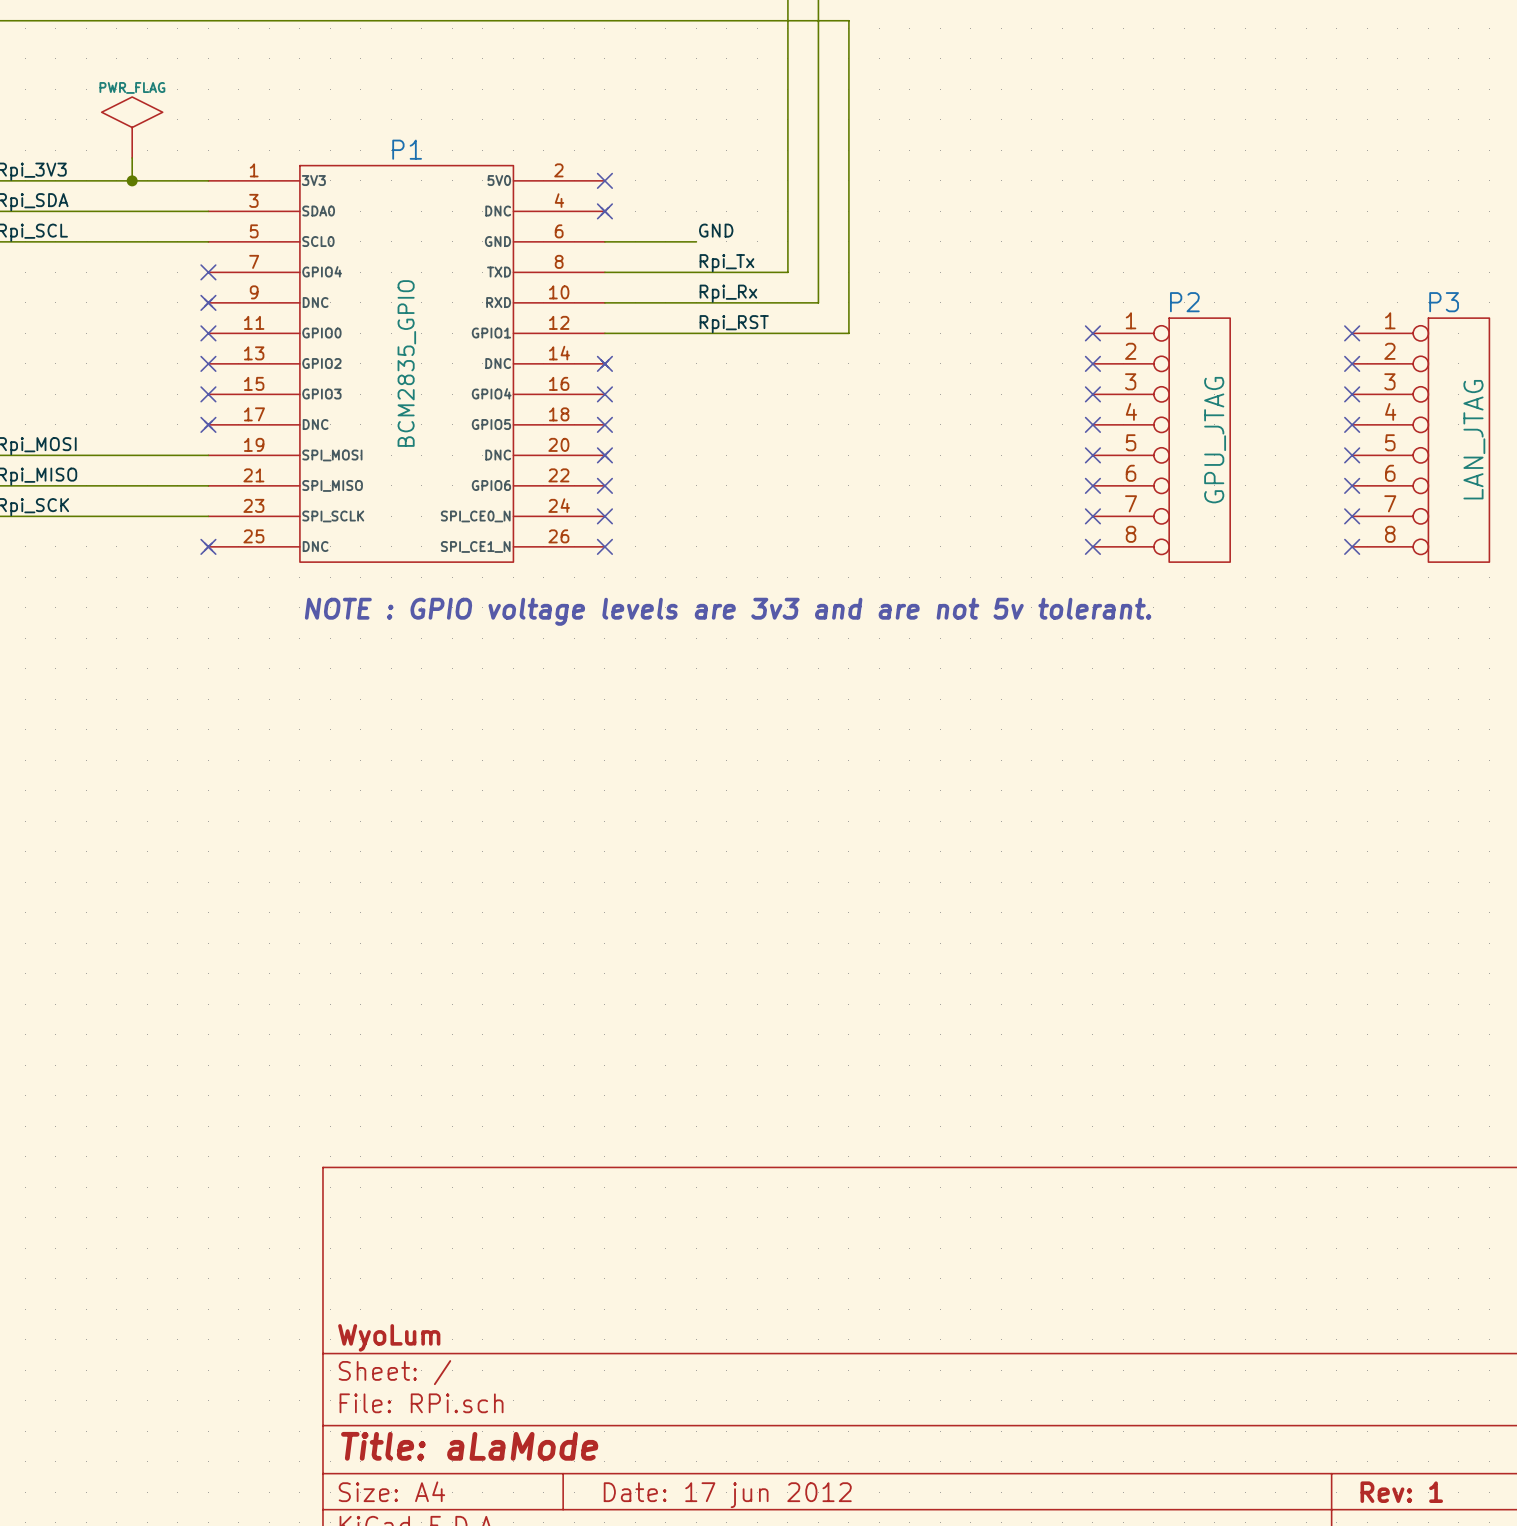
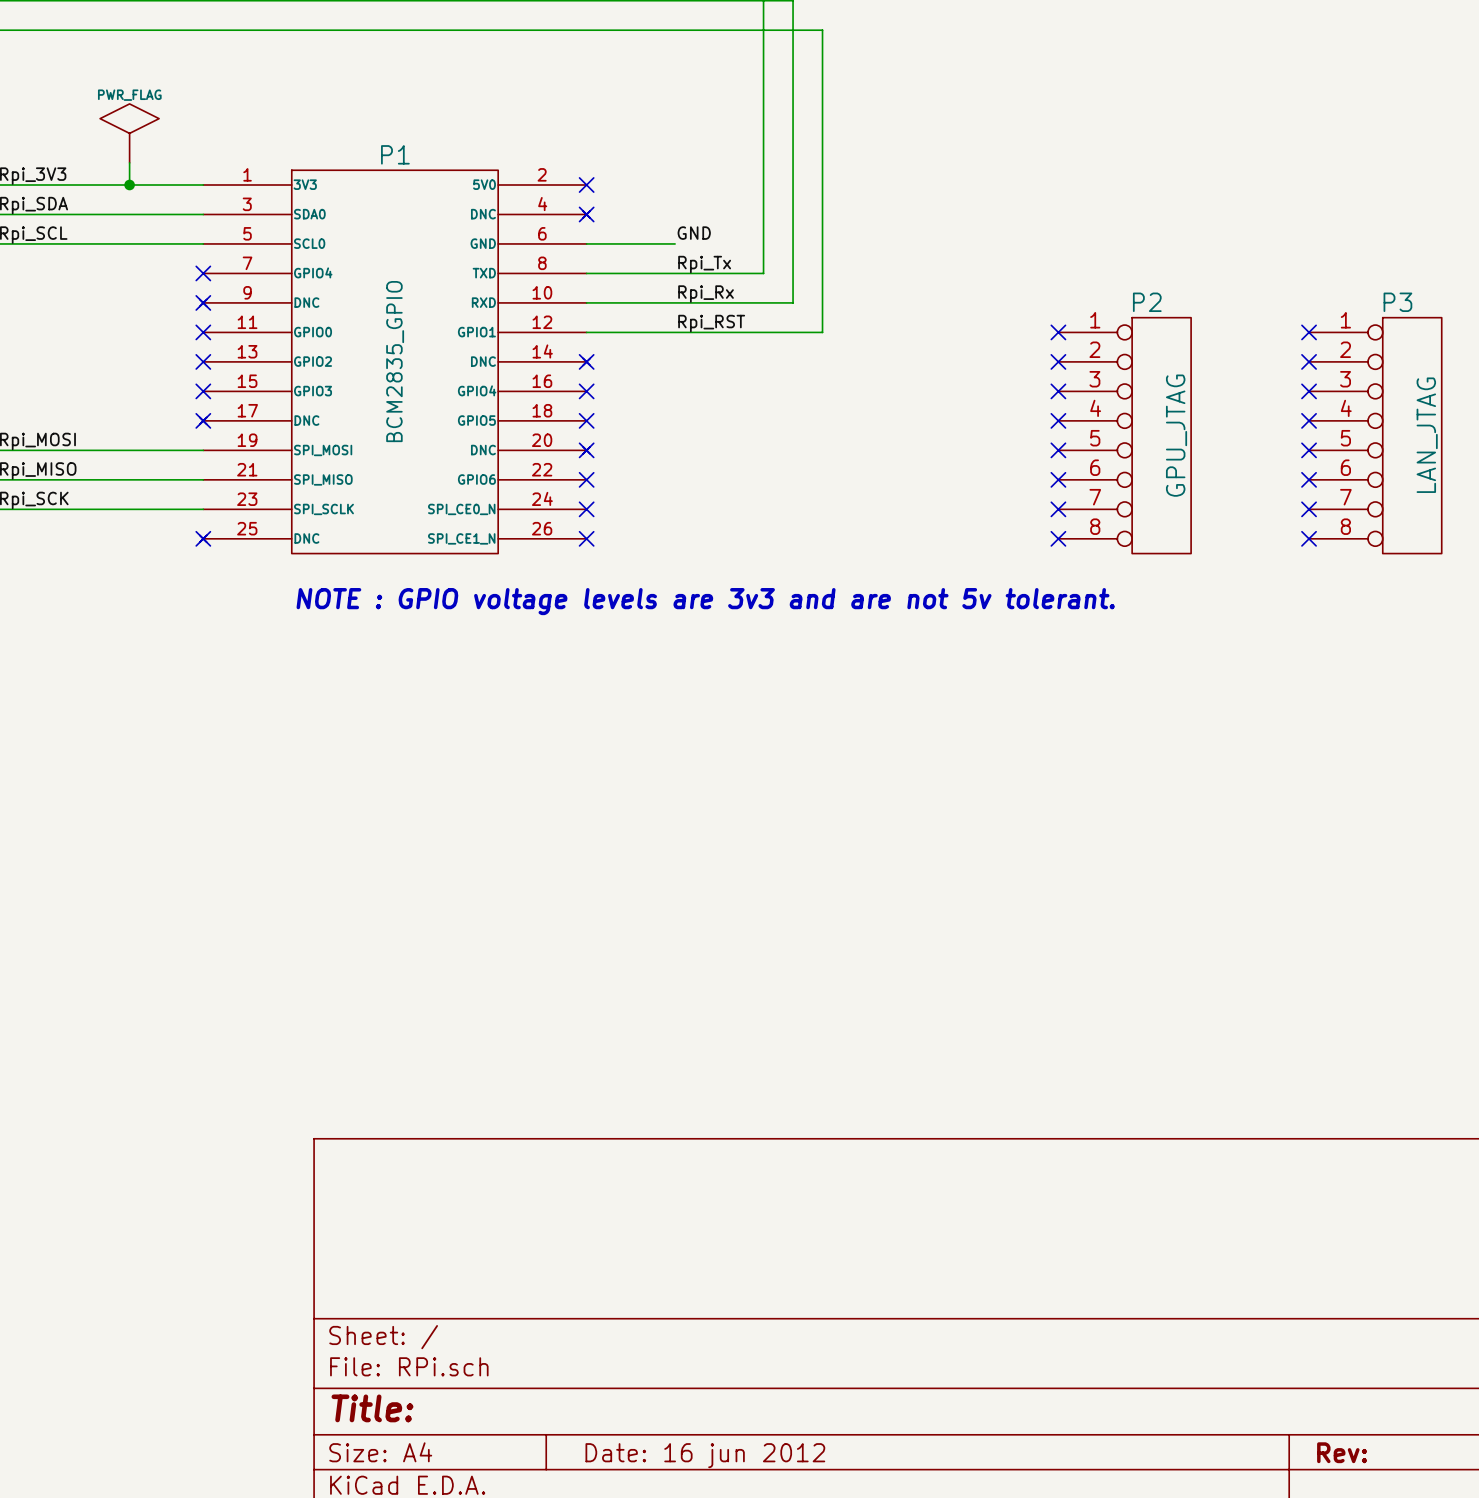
title block: WyoLum (389, 1337) -> none
title block: Title: aLaMode (469, 1446) -> Title: (372, 1408)
title block: Rev: 1 (1401, 1492) -> Rev: (1342, 1452)
title block: Date: 17 jun 2012 (727, 1495) -> Date: 16 jun 2012 (705, 1455)

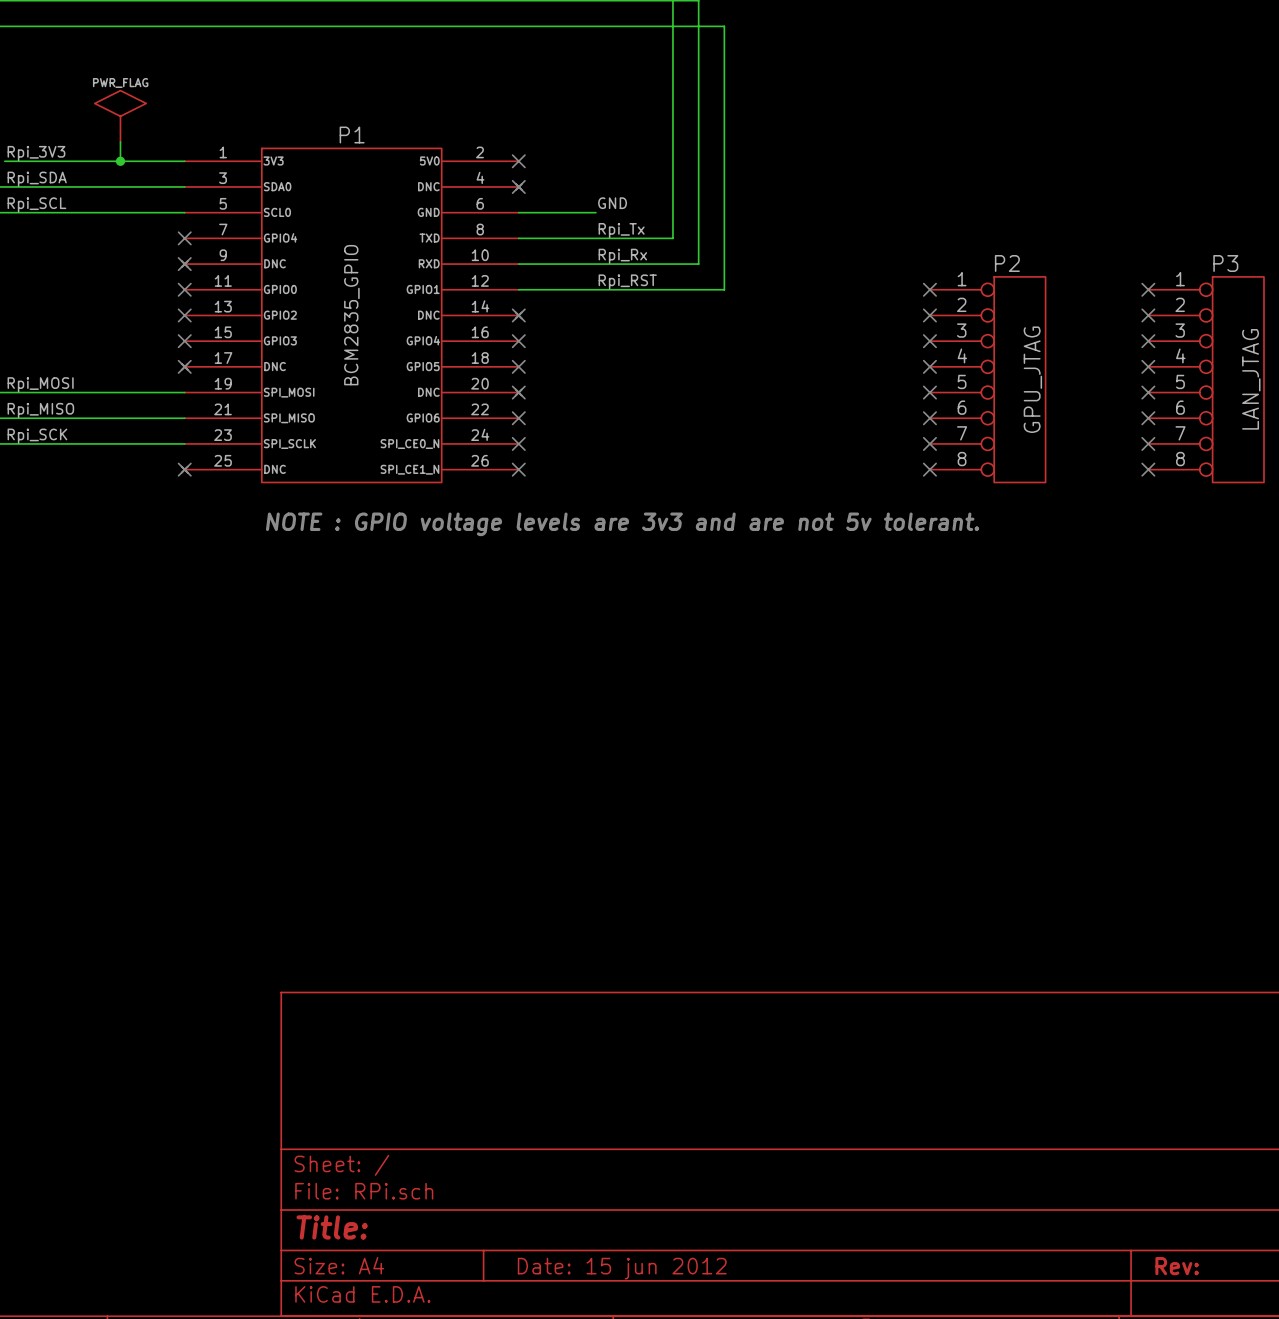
title block: Date: 16 jun 2012 (705, 1455) -> Date: 15 jun 2012 (622, 1268)

